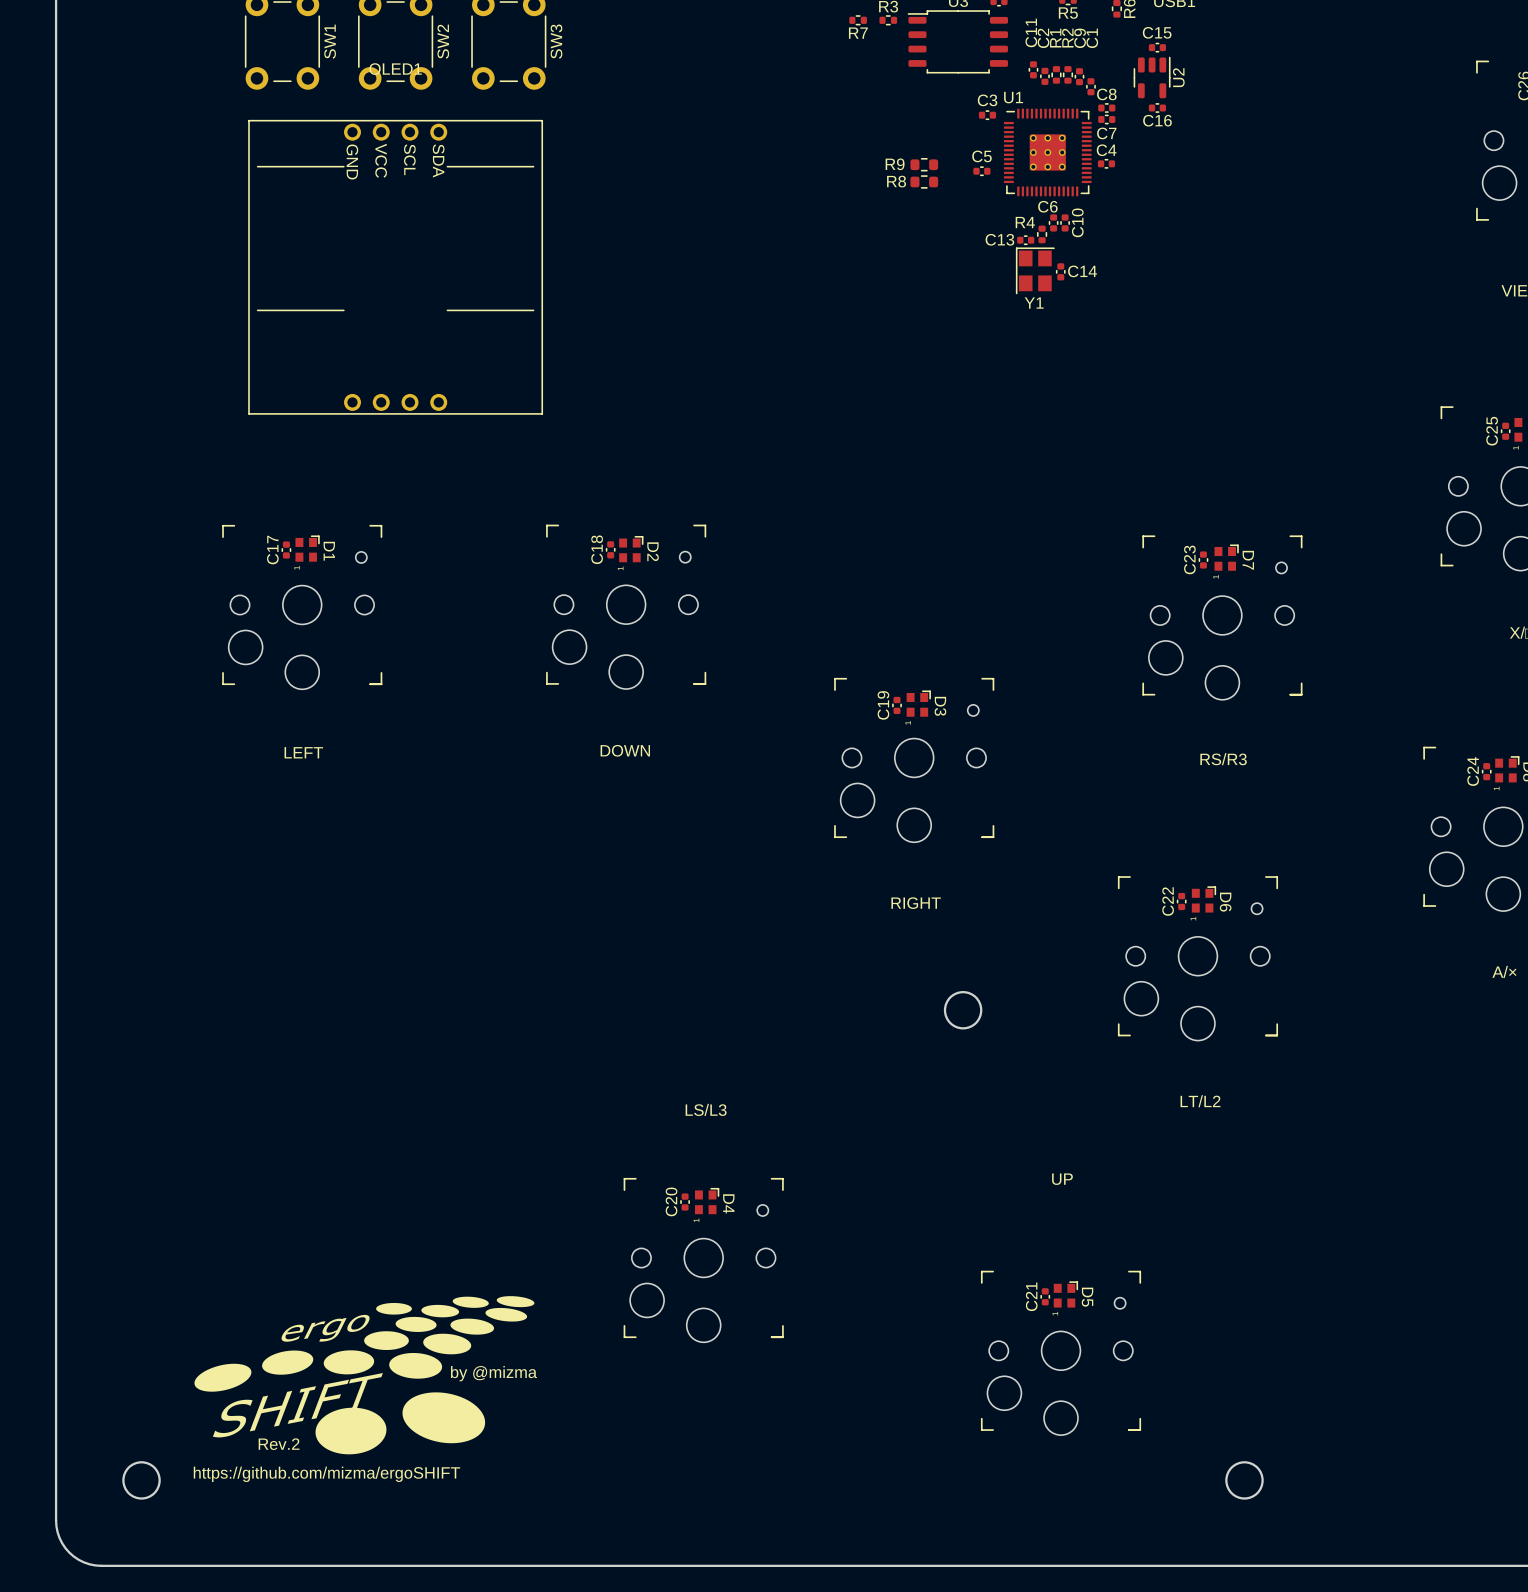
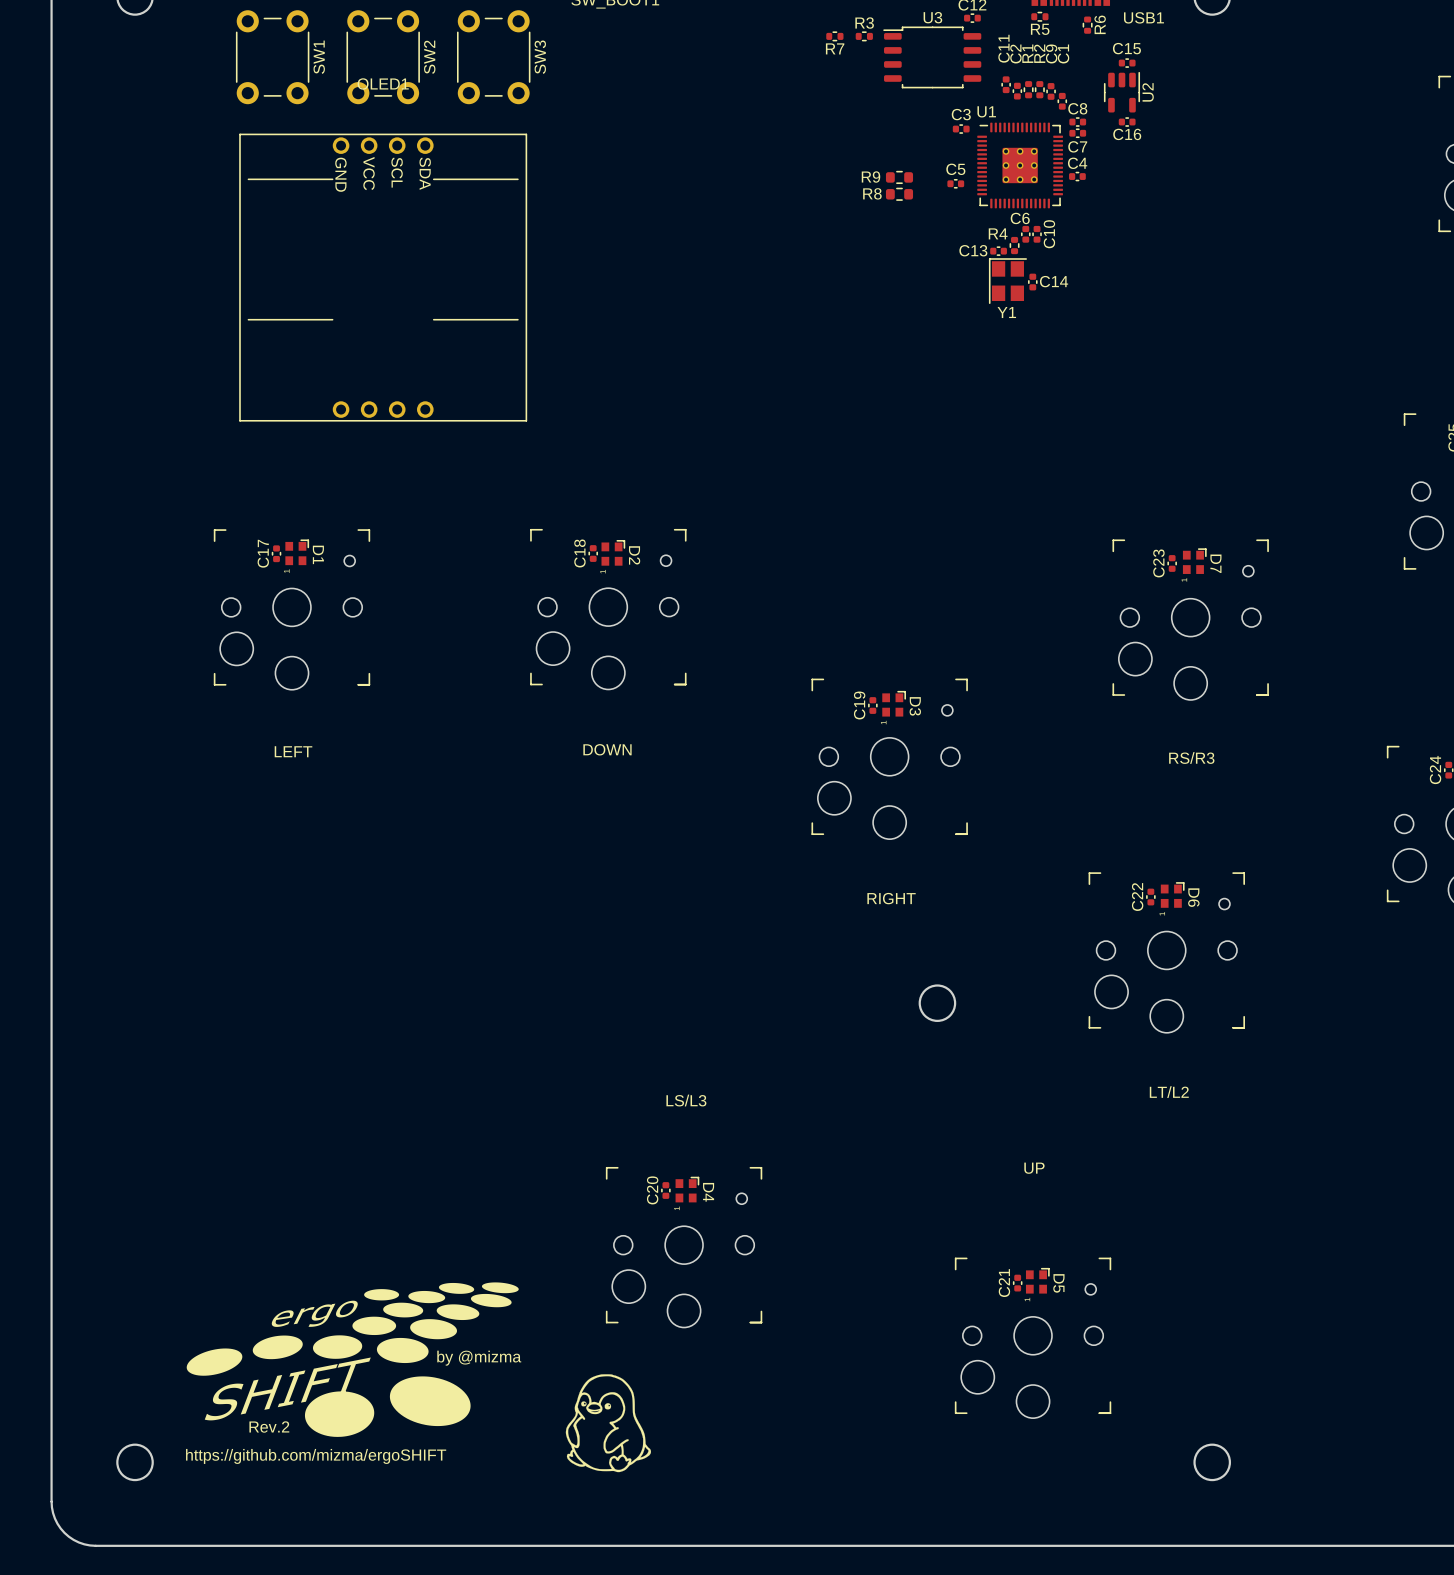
drawing: none -> [565, 1374, 652, 1473]

